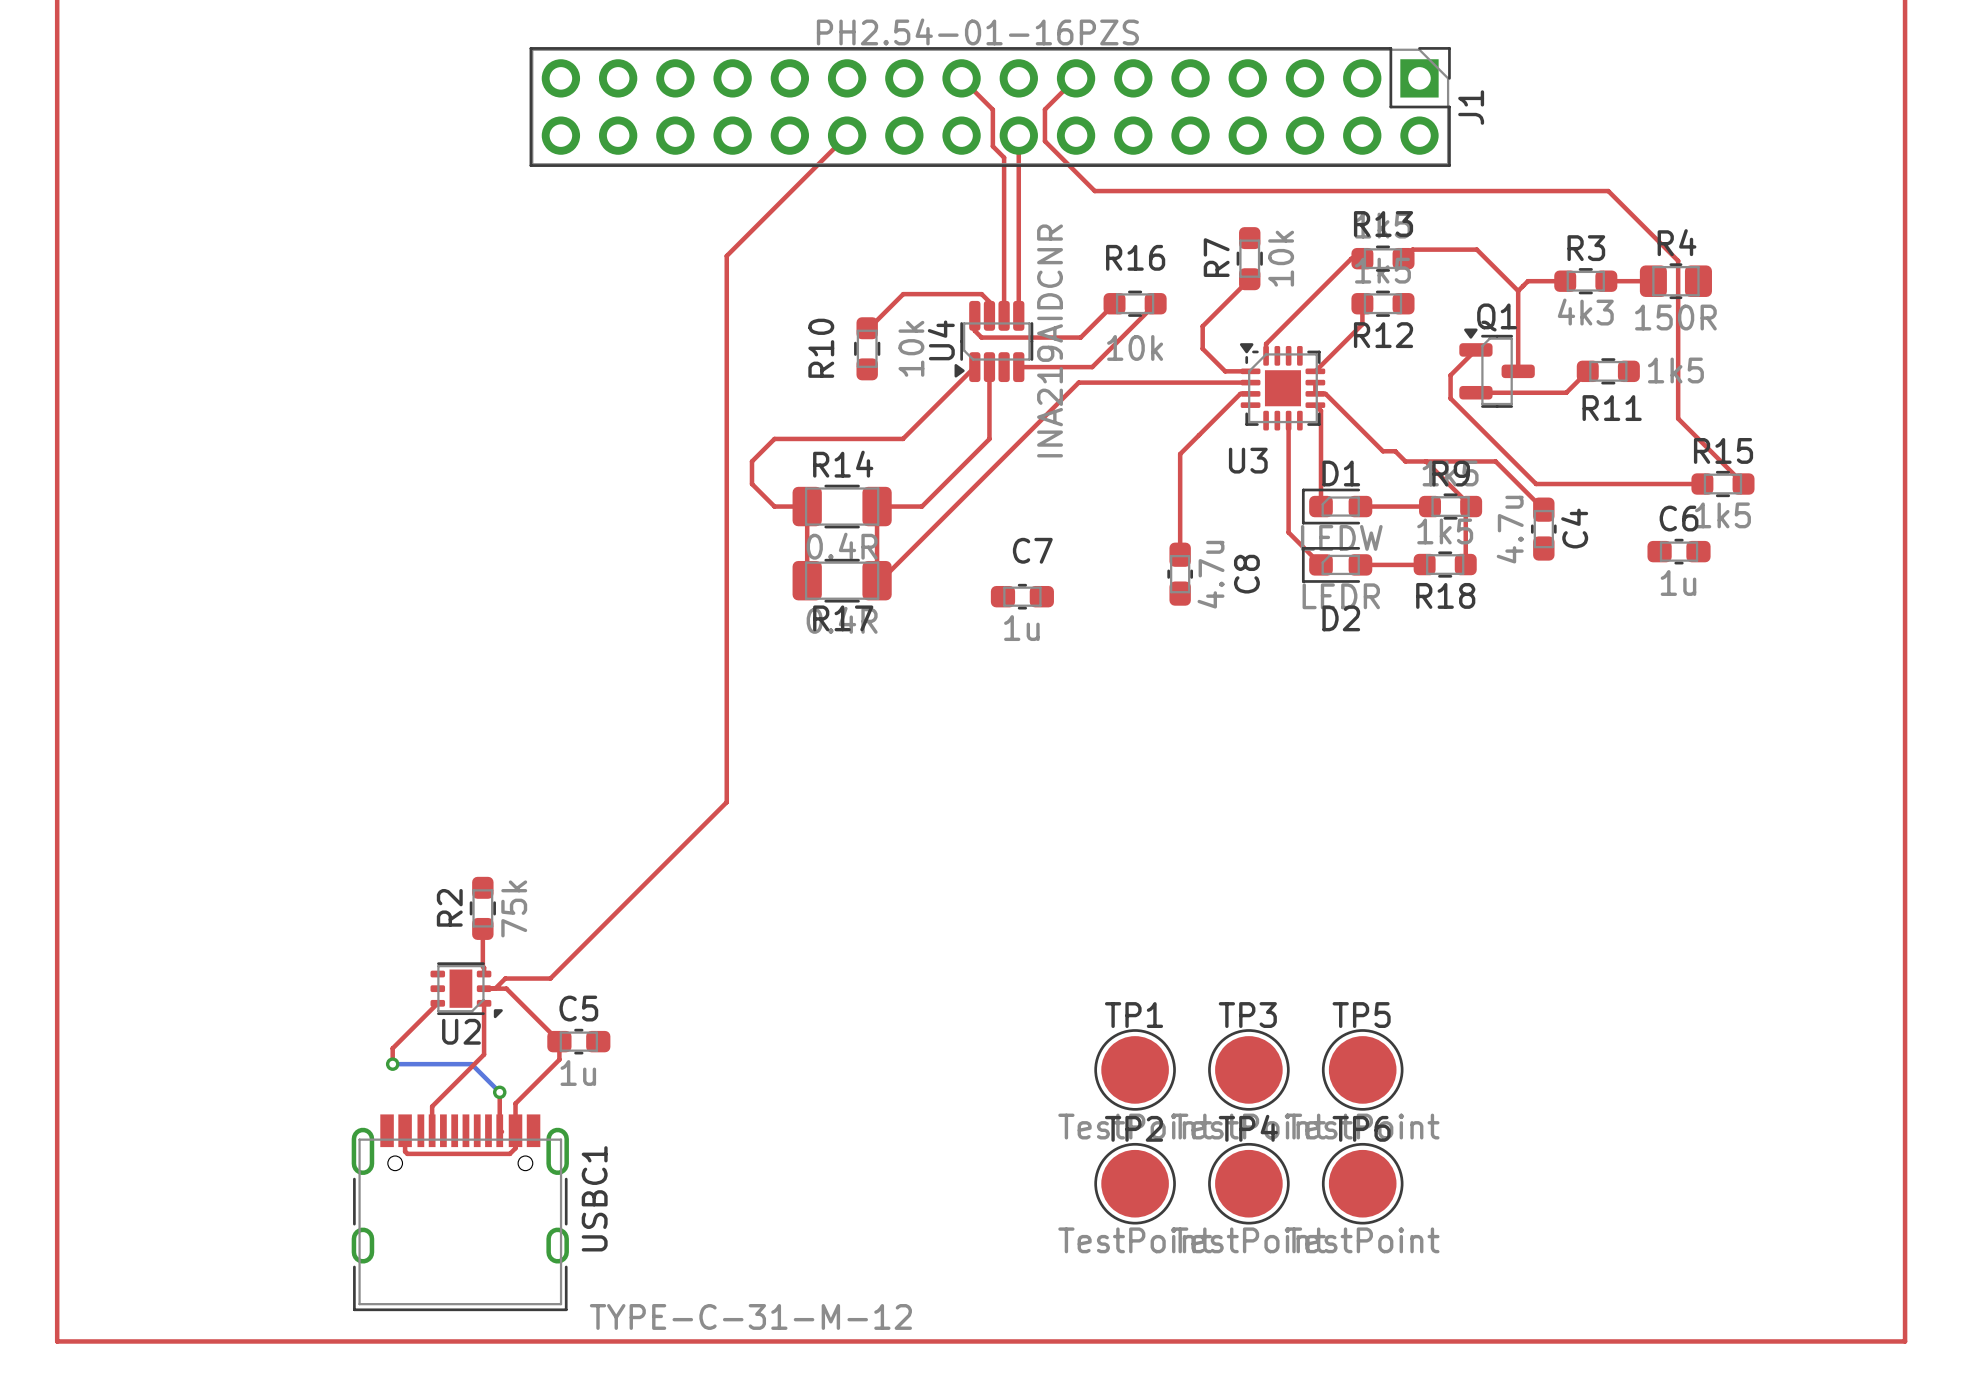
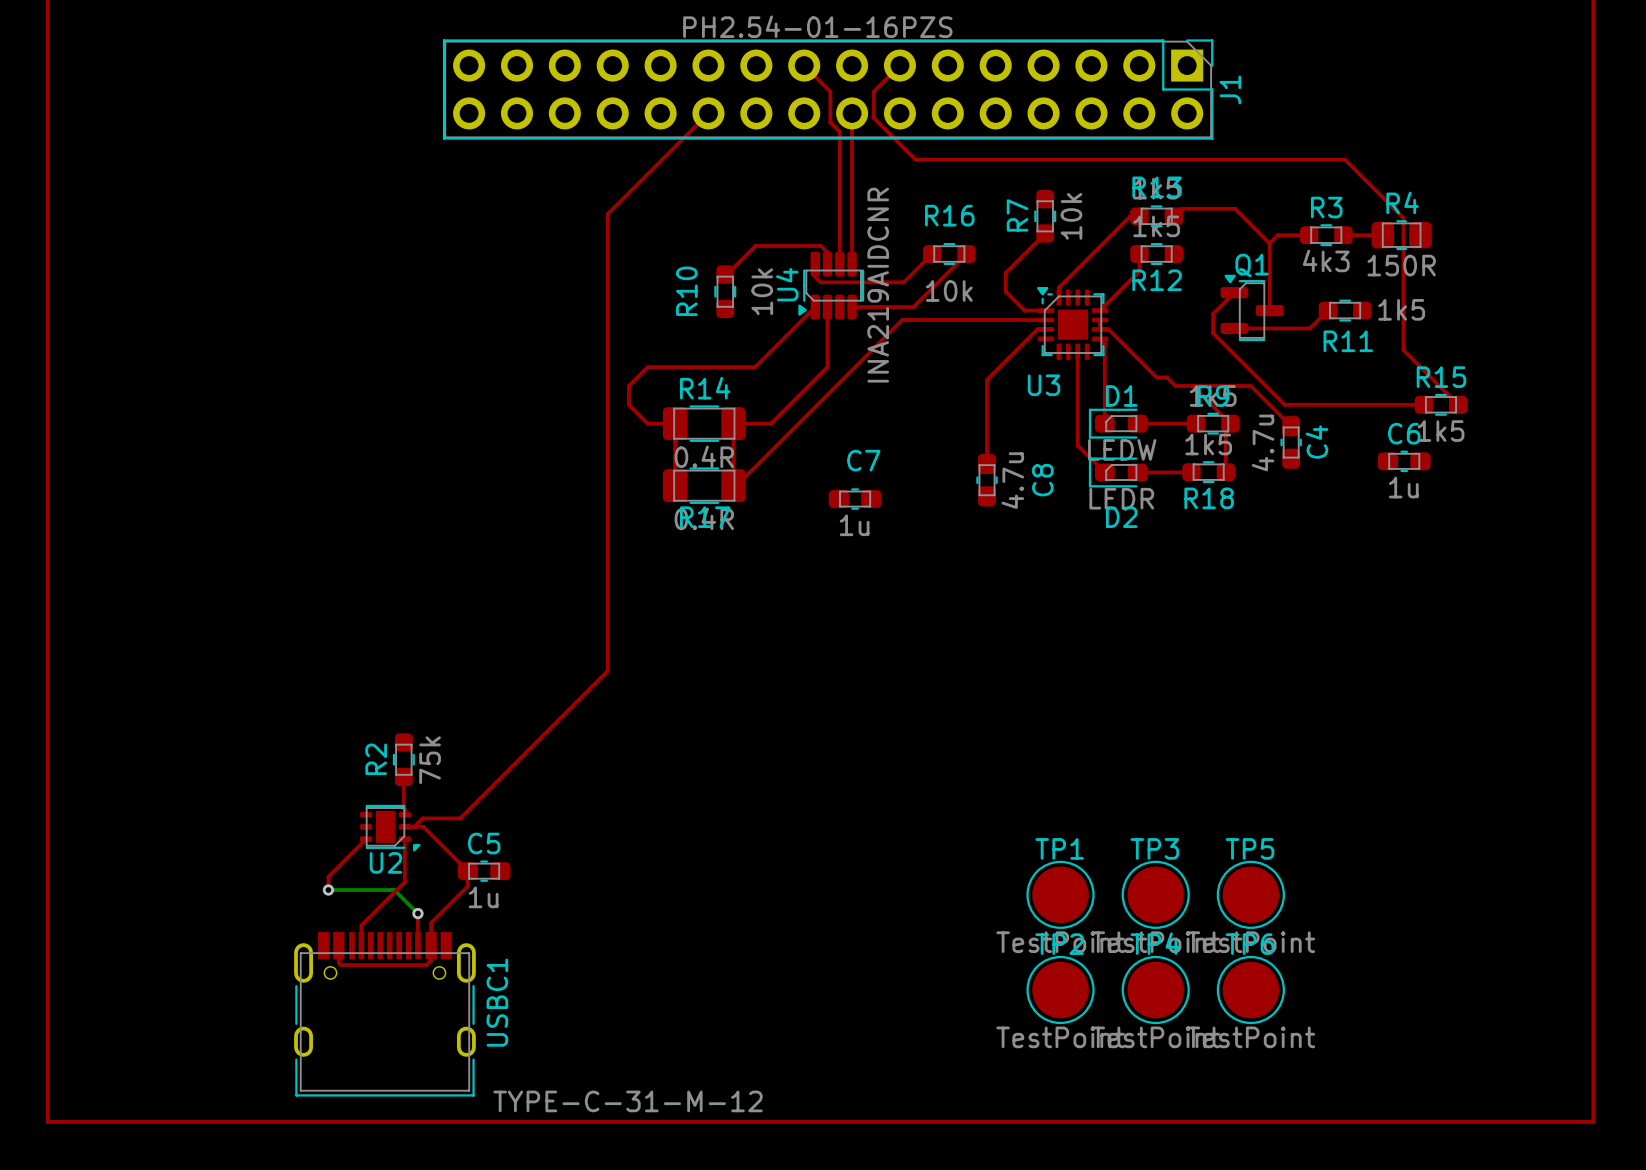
TP1 position: (1135, 1069) -> (1060, 894)
TP3 position: (1248, 1069) -> (1155, 894)
TP5 position: (1362, 1069) -> (1250, 894)
TP2 position: (1135, 1183) -> (1060, 990)
TP4 position: (1248, 1183) -> (1155, 990)
TP6 position: (1362, 1183) -> (1250, 990)

